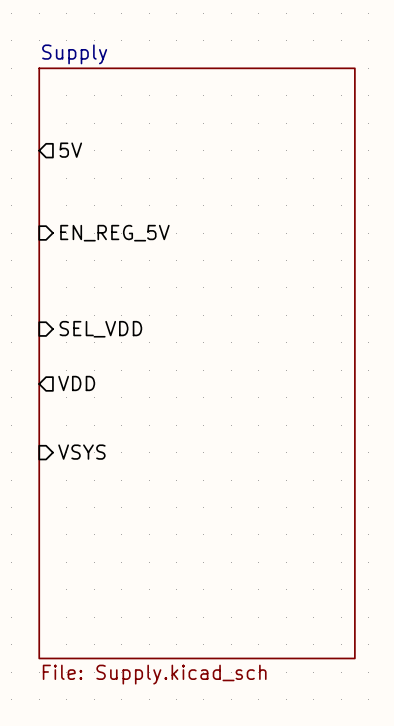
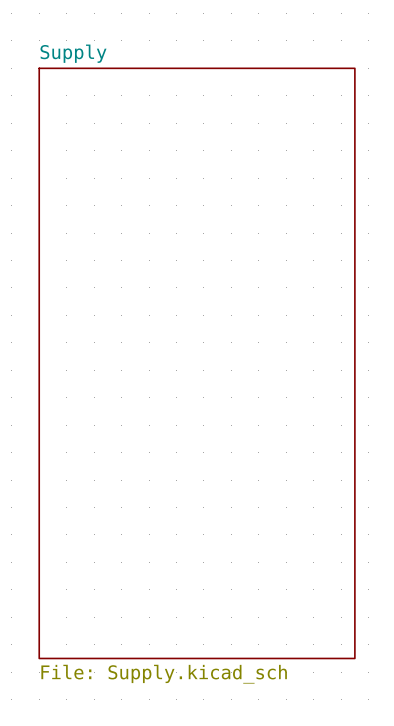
sheet pin: 5V (70, 150) -> none
sheet pin: EN_REG_5V (114, 233) -> none
sheet pin: SEL_VDD (100, 329) -> none
sheet pin: VDD (76, 383) -> none
sheet pin: VSYS (81, 452) -> none

